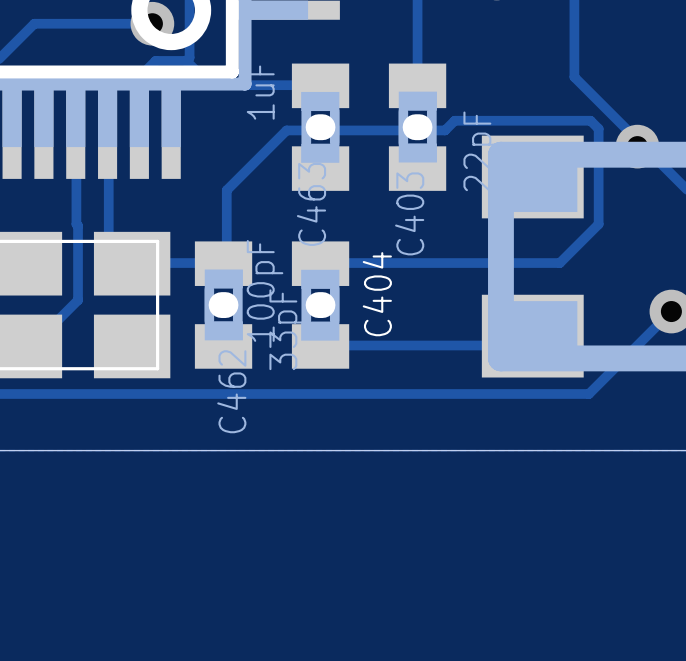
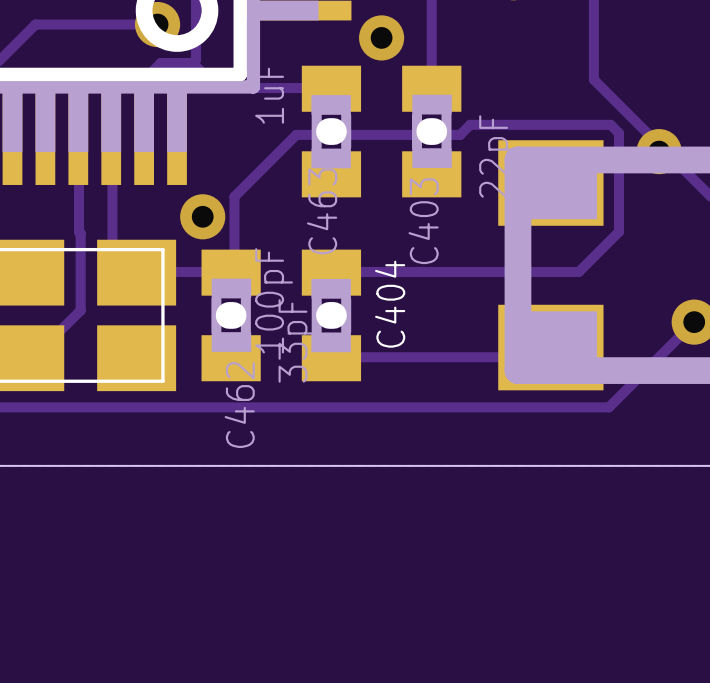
via: none -> (381, 37)
via: none -> (202, 216)

